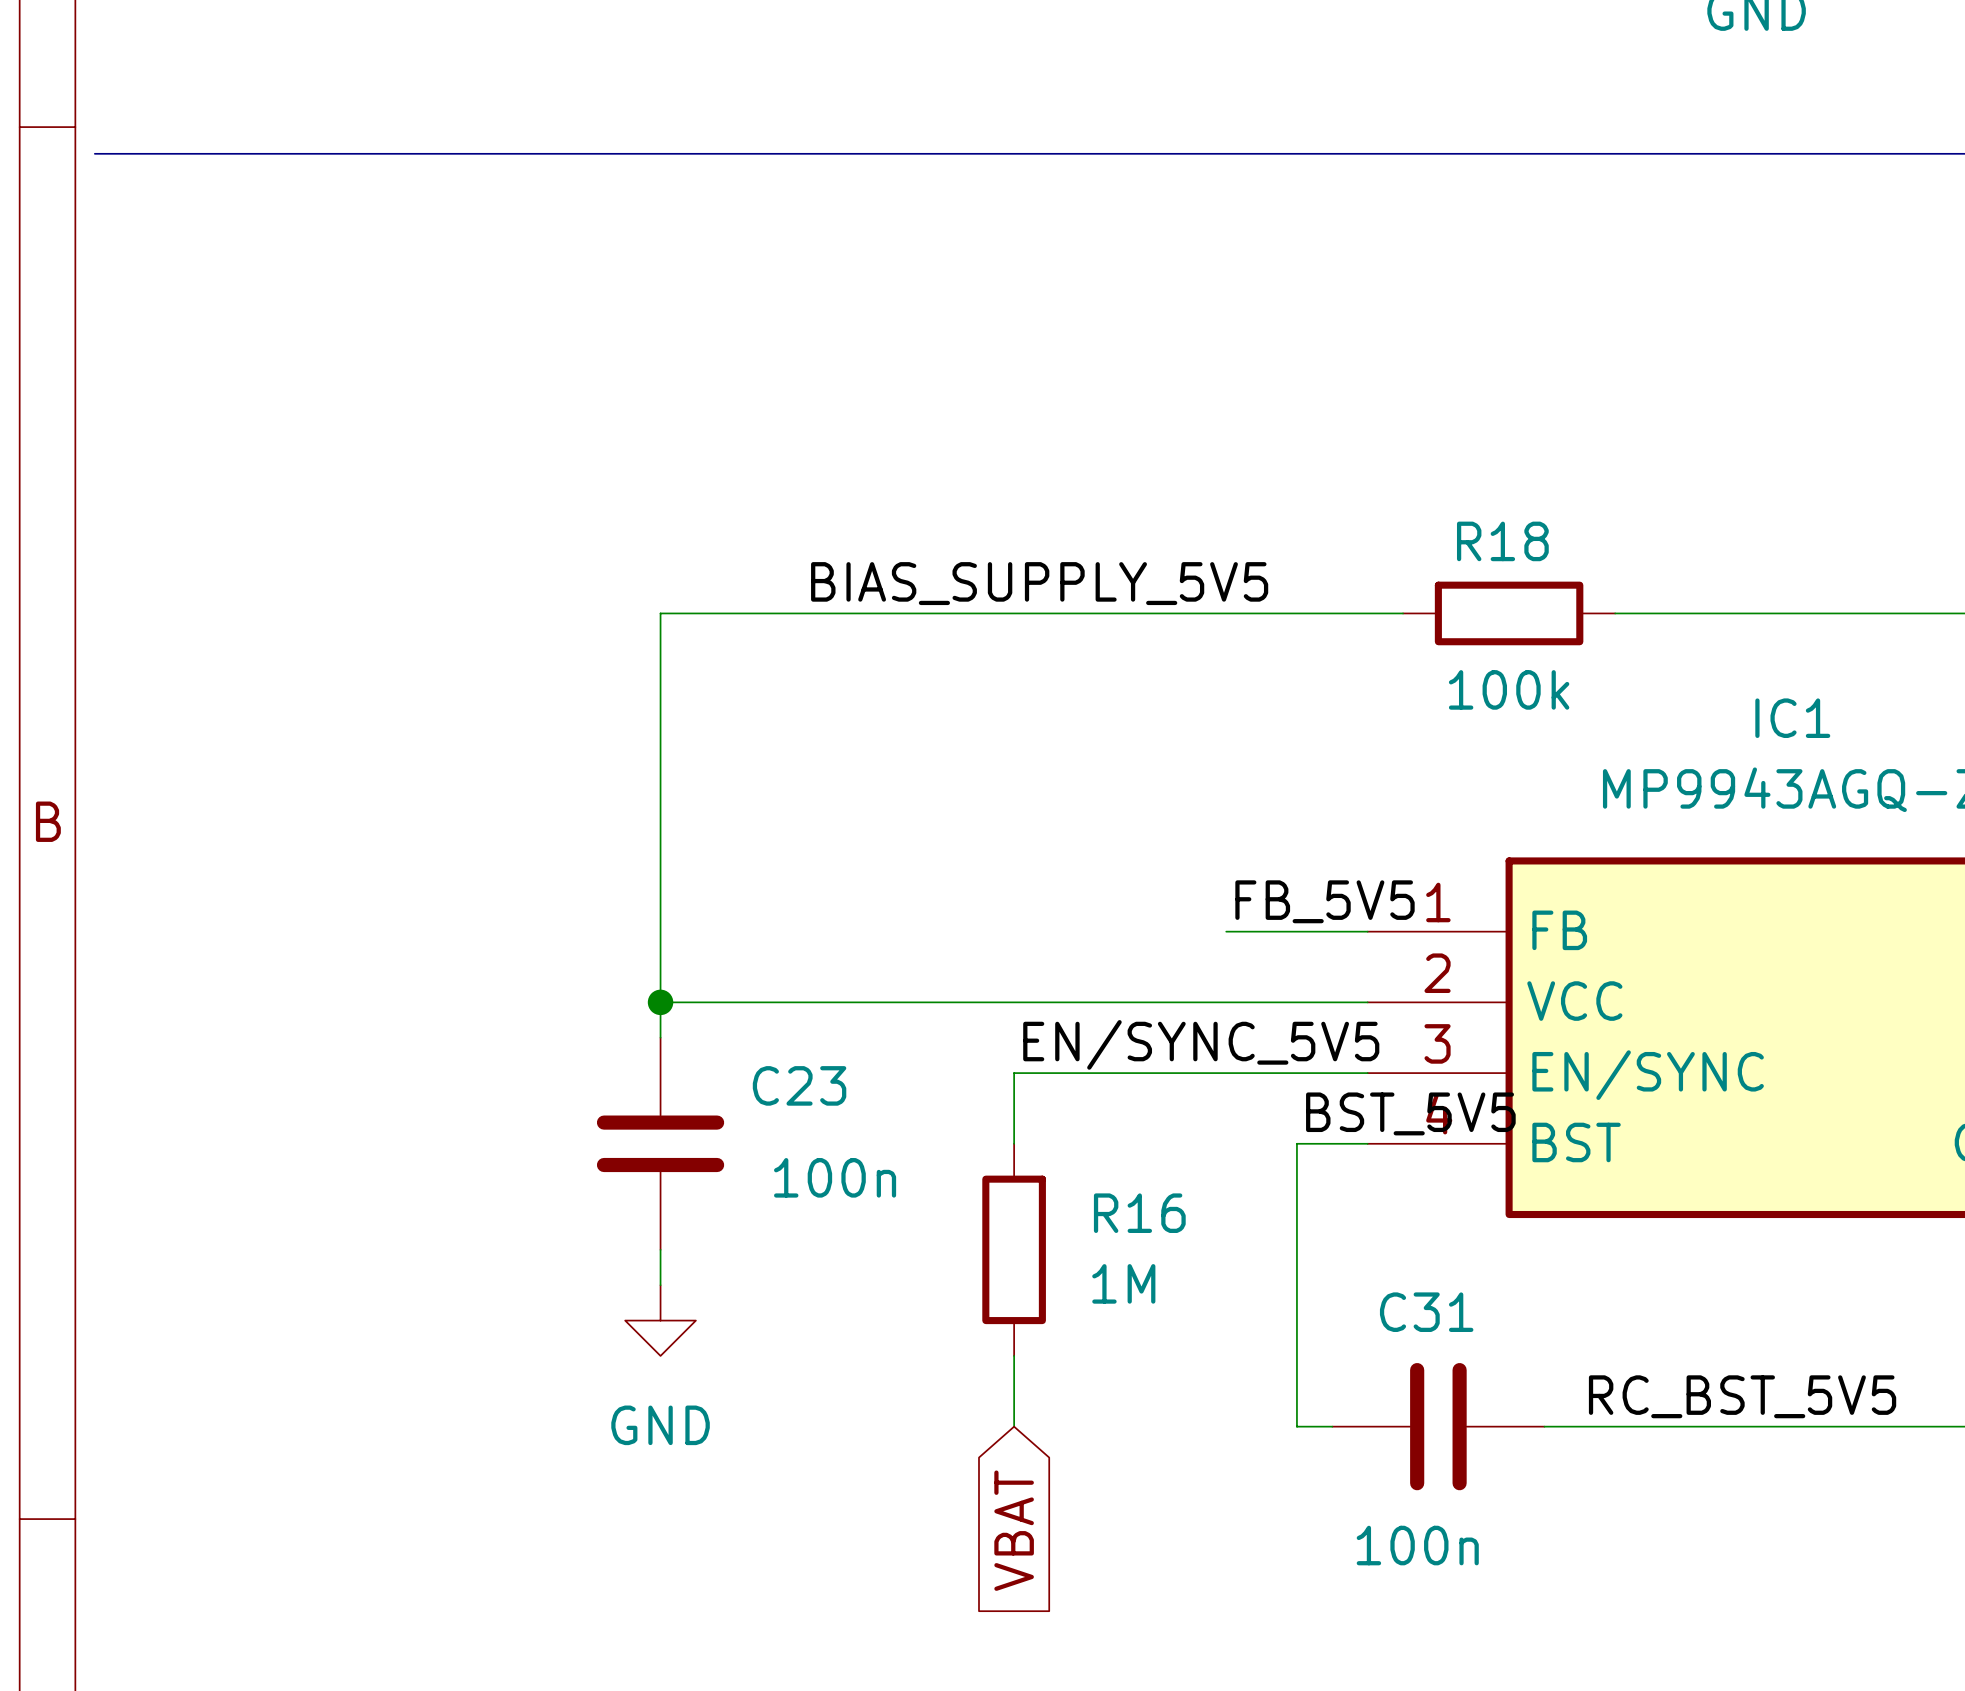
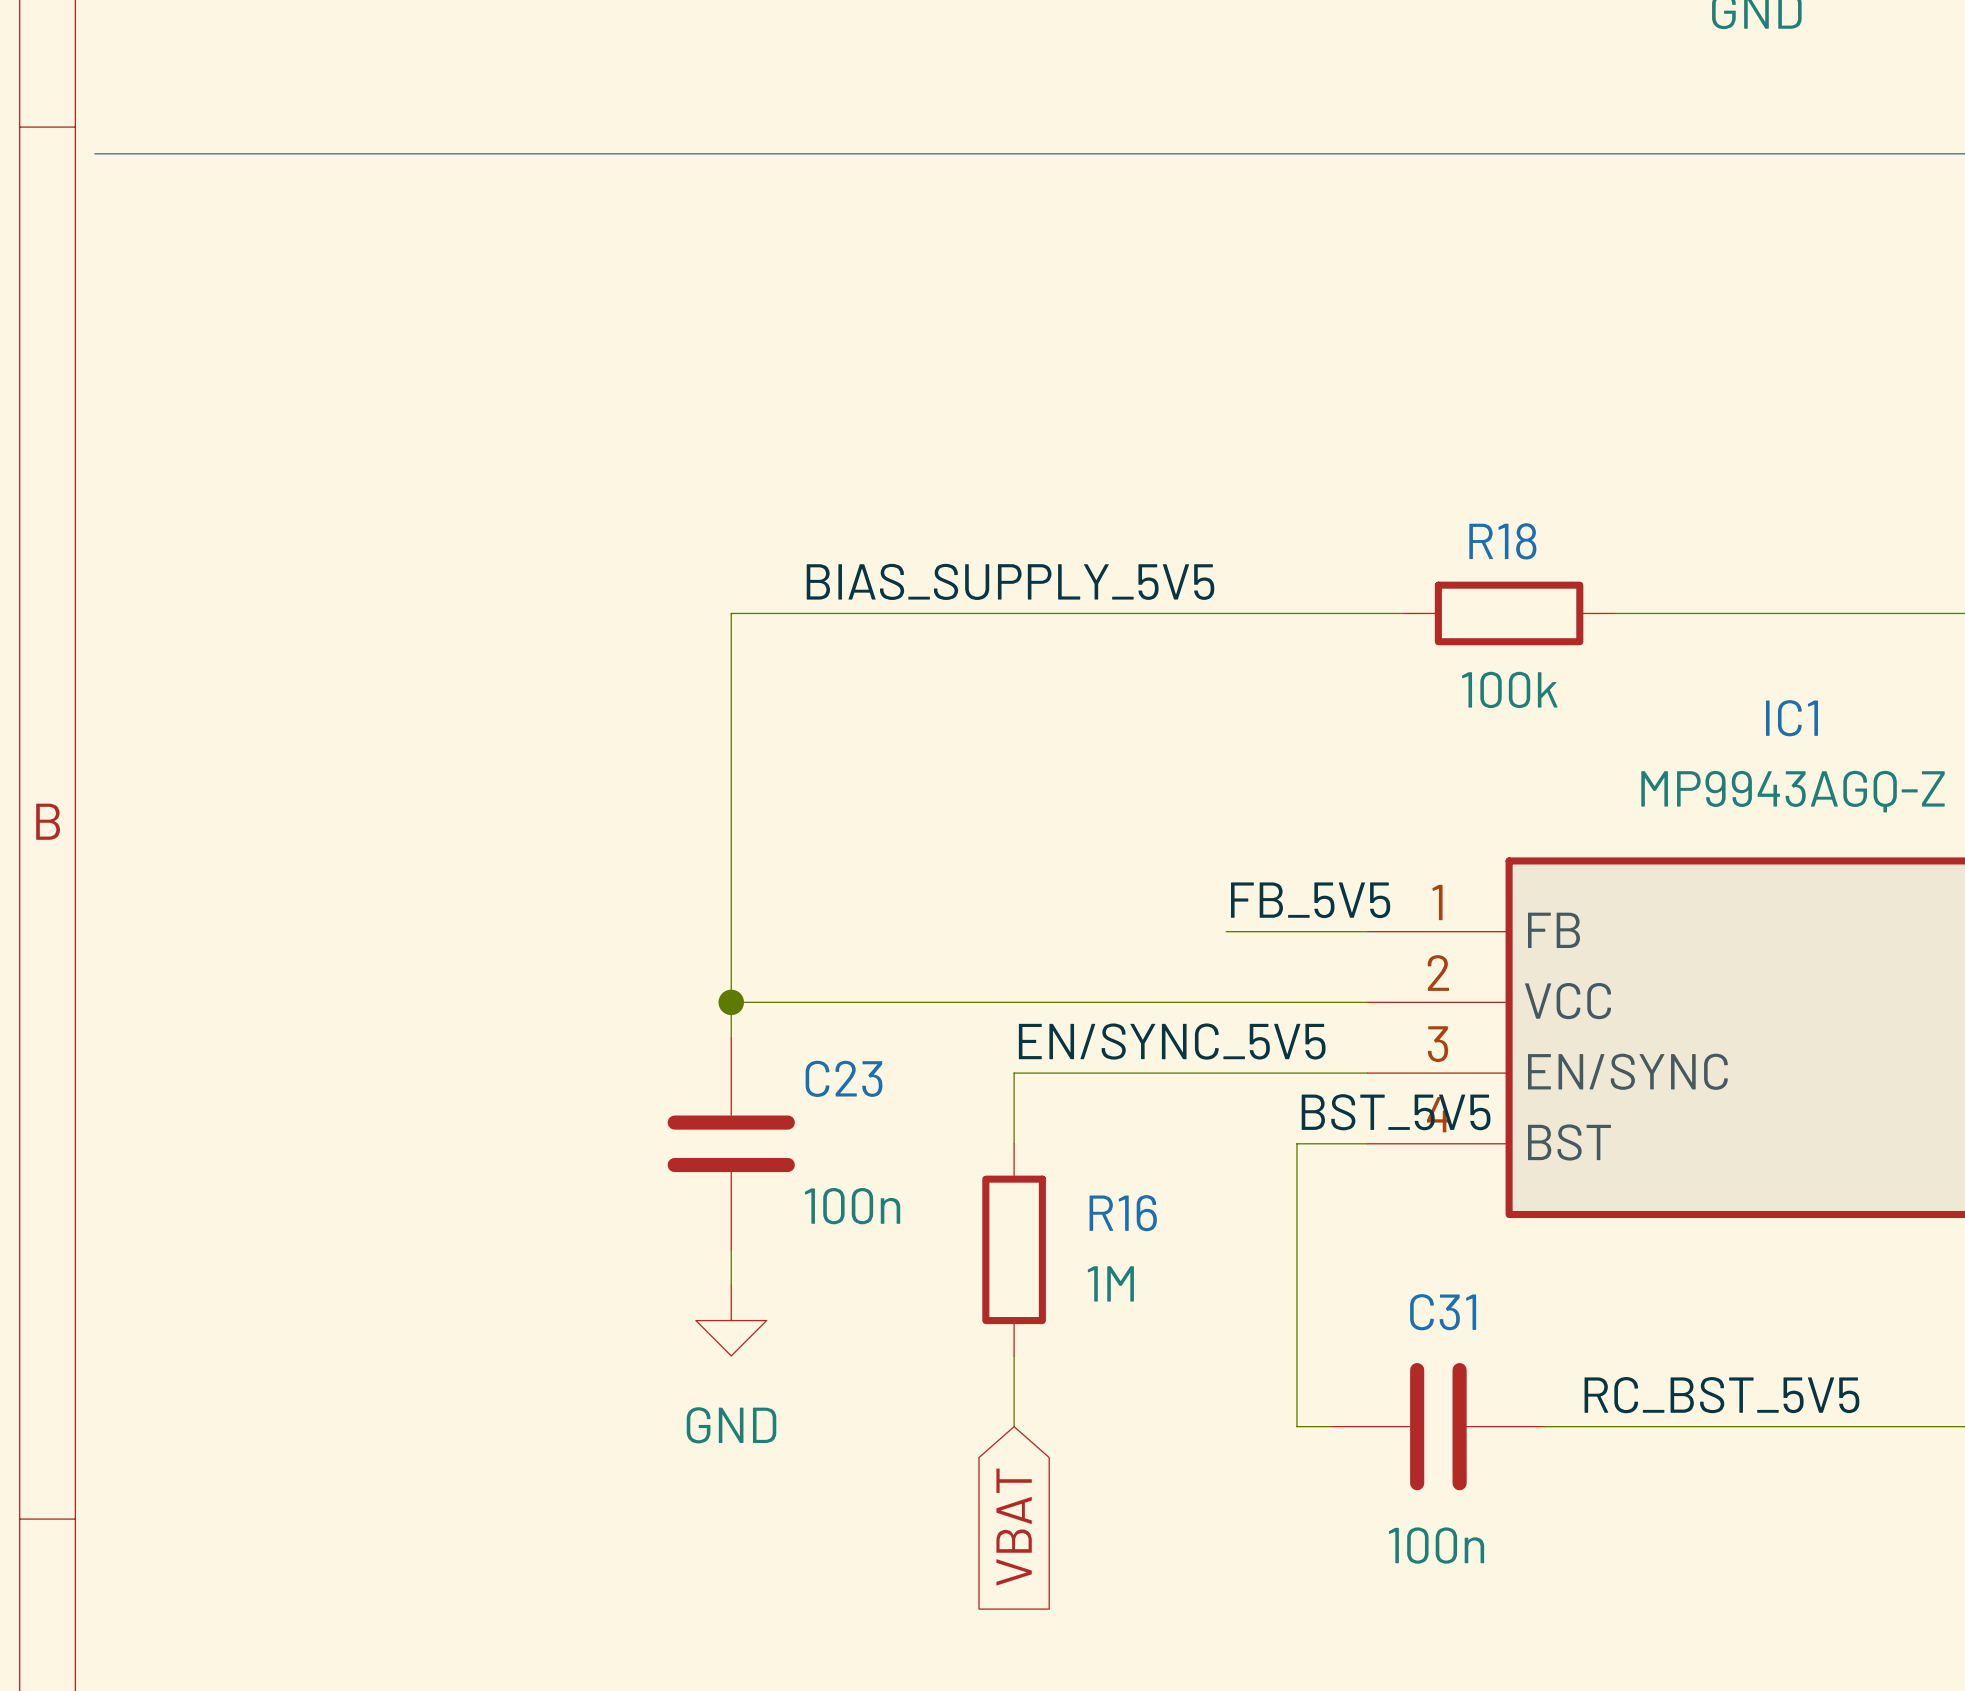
wire: (731, 613) (660, 613) (660, 1037) -> (731, 613) (731, 1037)
wire: (660, 1002) (731, 1002) -> none
junction position: (660, 1002) -> (731, 1002)
C23 name position: C23 (799, 1085) -> C23 (844, 1078)
C23 position: (660, 1143) -> (731, 1143)
C23 value position: 100n (835, 1177) -> 100n (852, 1206)
wire: (660, 1249) (660, 1285) -> (731, 1249) (731, 1285)
power symbol position: GND (660, 1320) -> GND (731, 1320)

